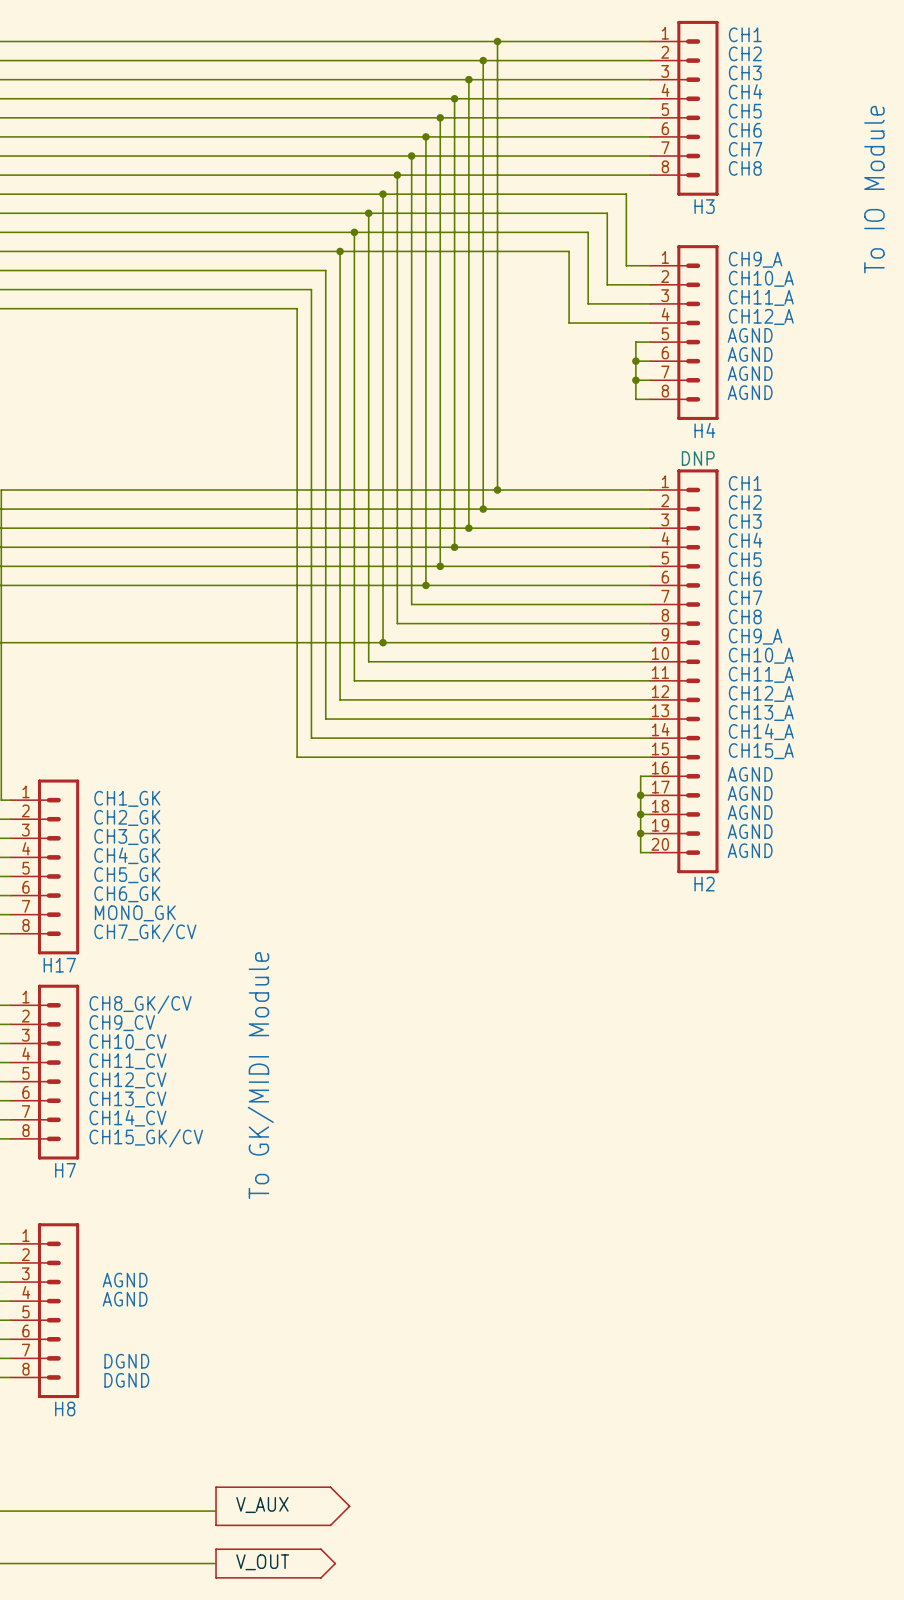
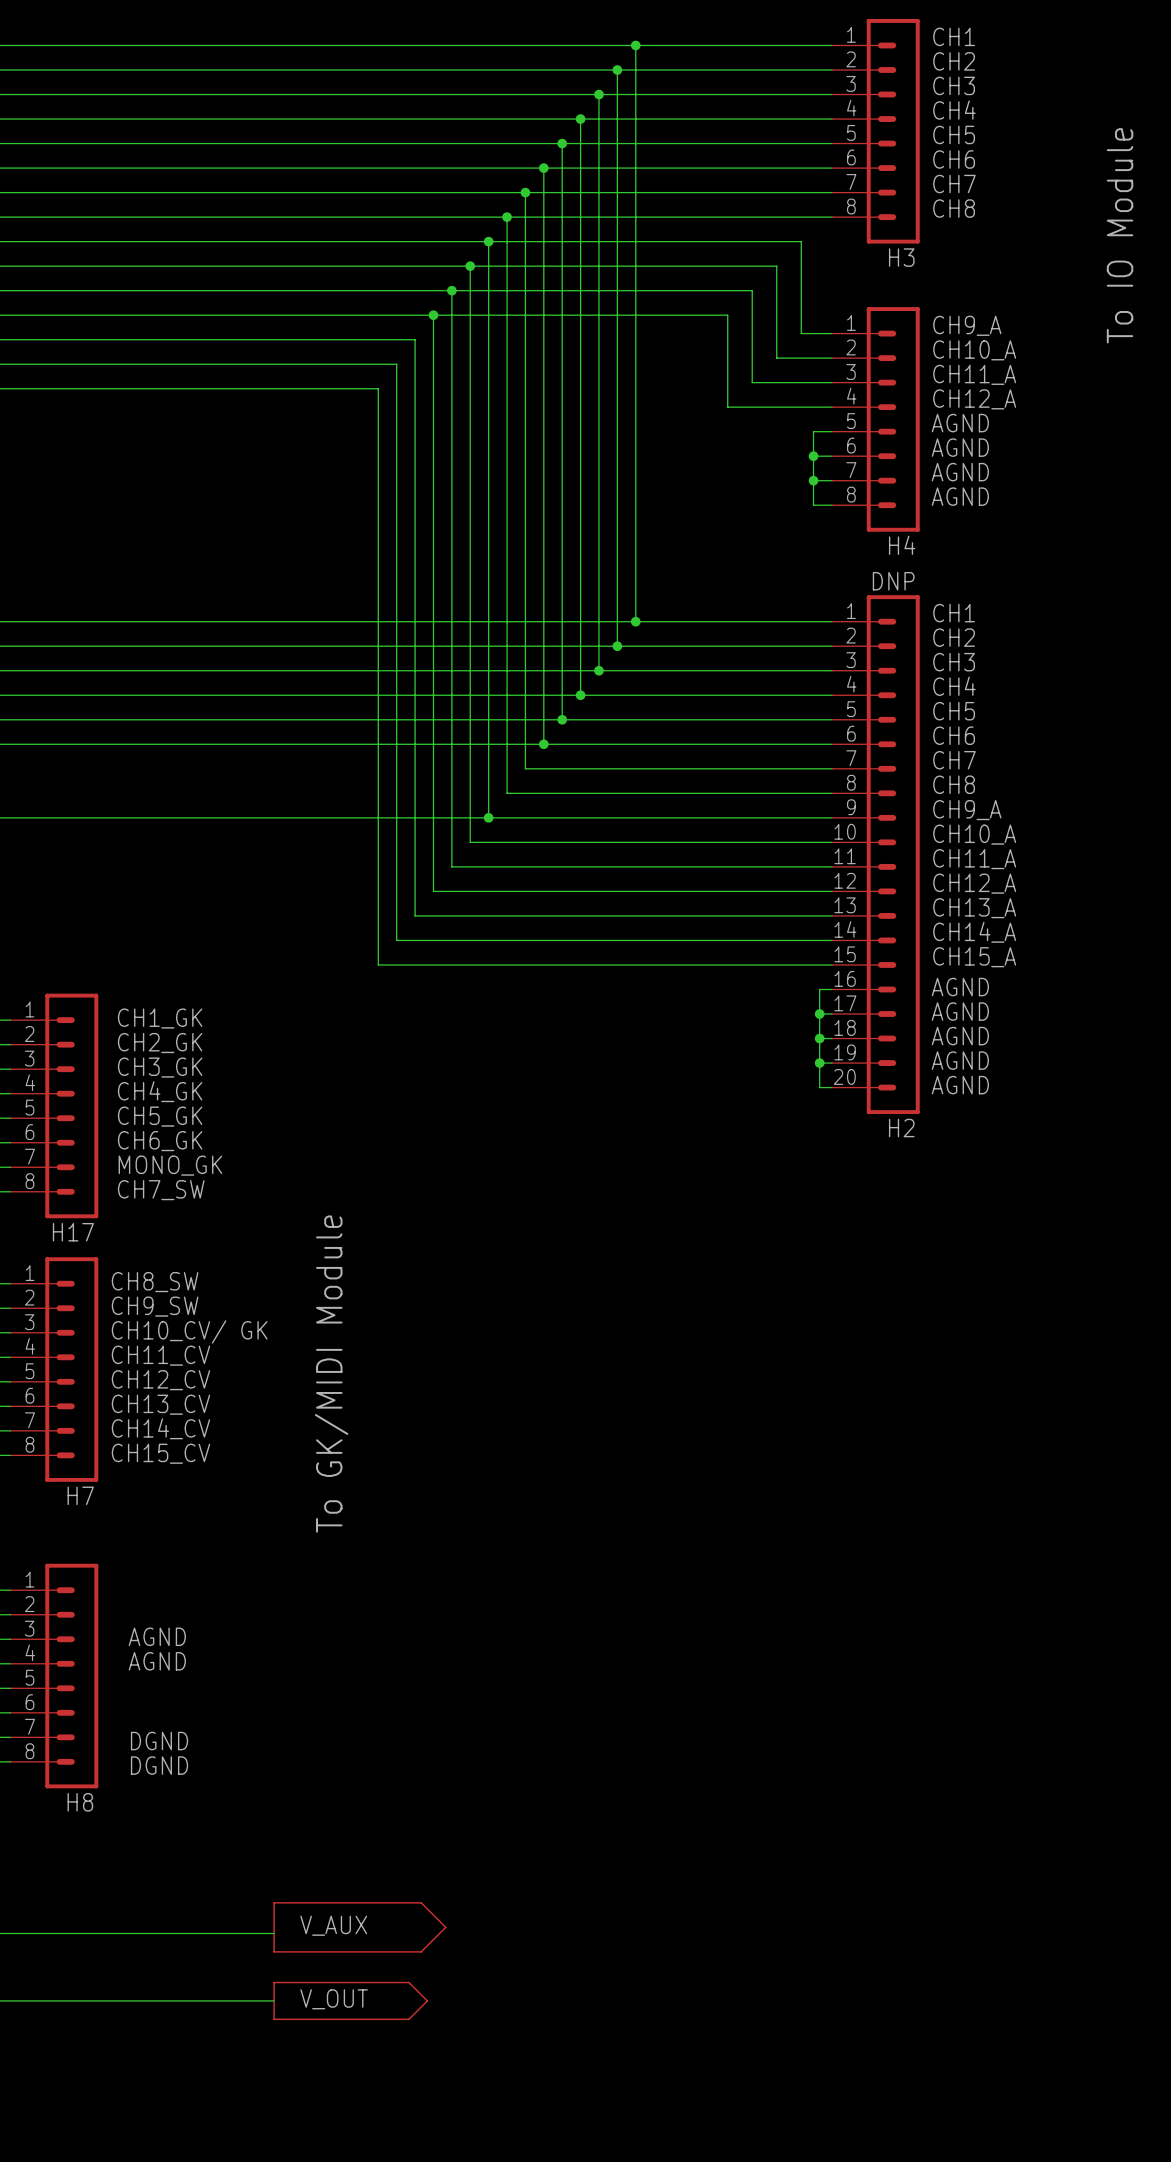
text: CH7_GK/CV (145, 933) -> CH7_SW (161, 1190)
text: CH8_GK/CV (140, 1004) -> CH8_SW (155, 1282)
text: CH9_CV (122, 1023) -> CH9_SW (155, 1306)
text: CH10_CV (127, 1042) -> CH10_CV/ GK (189, 1331)
text: CH15_GK/CV (146, 1138) -> CH15_CV (160, 1453)

